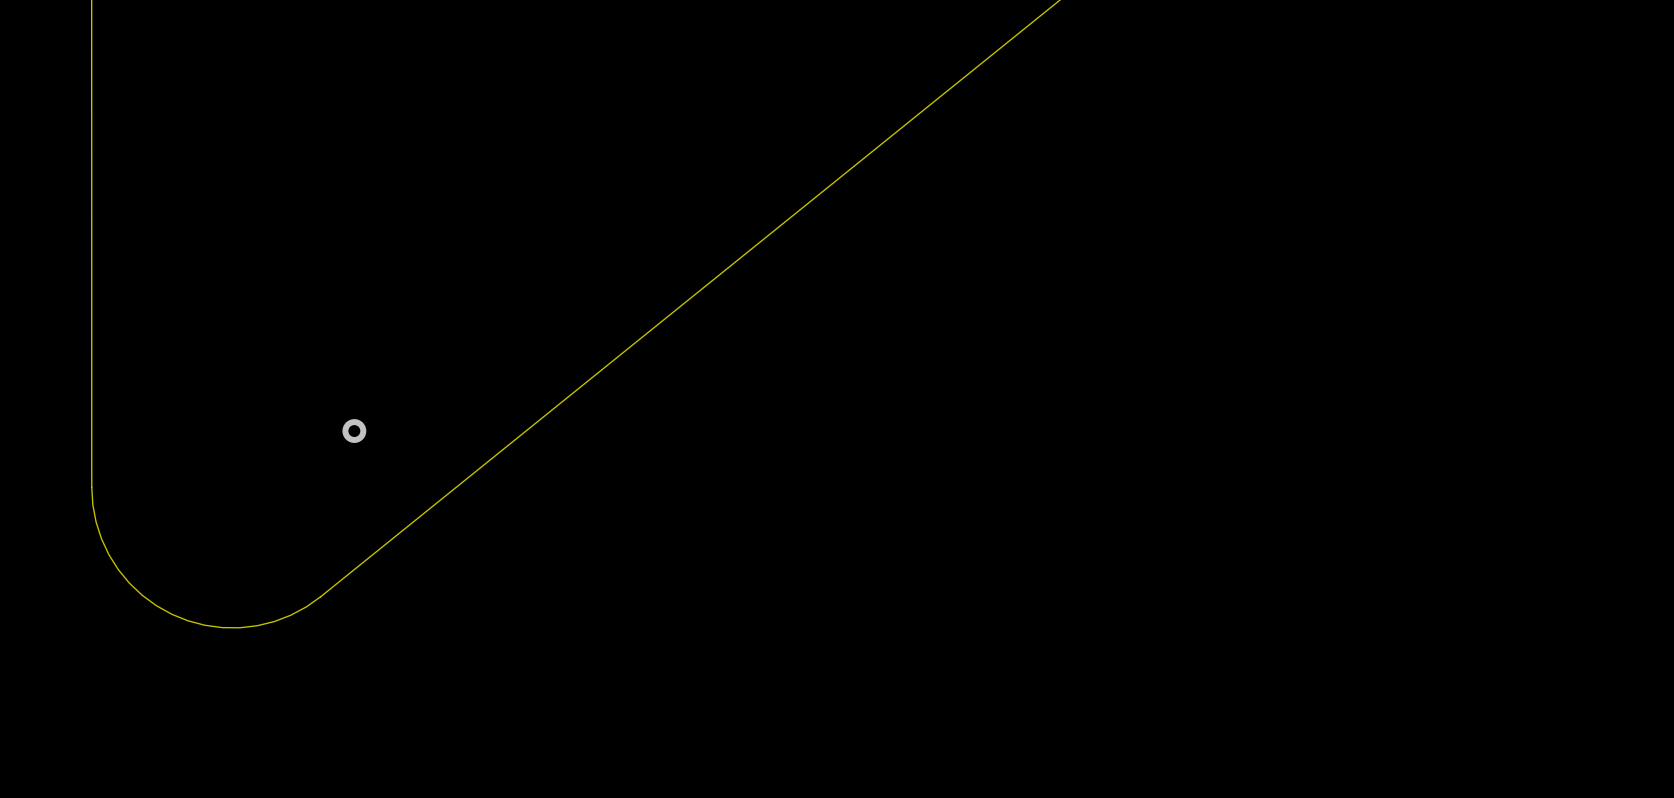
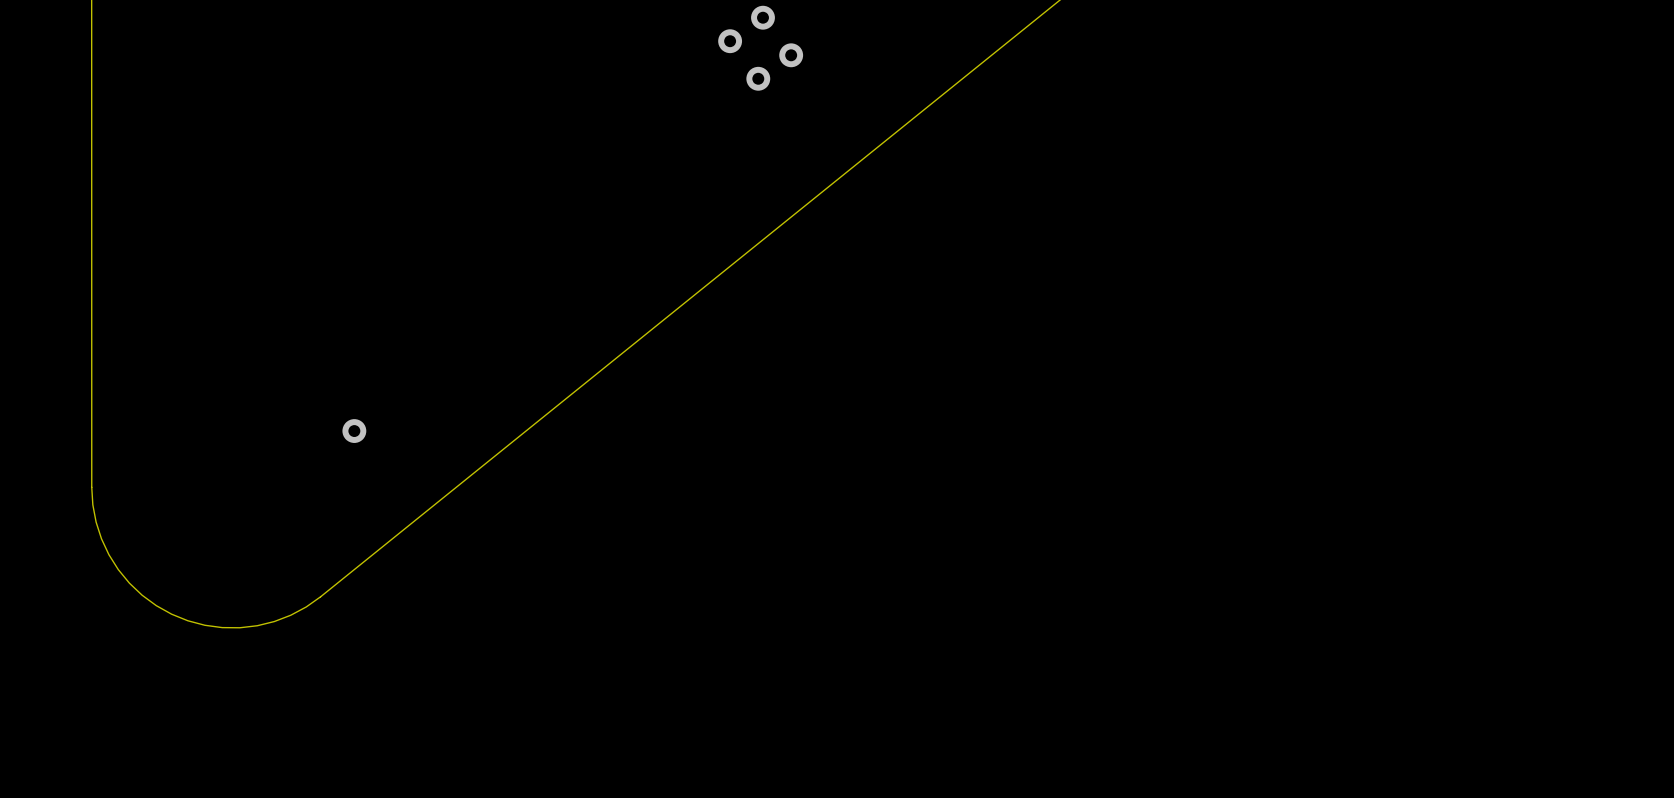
via: none -> (762, 17)
via: none -> (730, 41)
via: none -> (791, 55)
via: none -> (758, 78)

